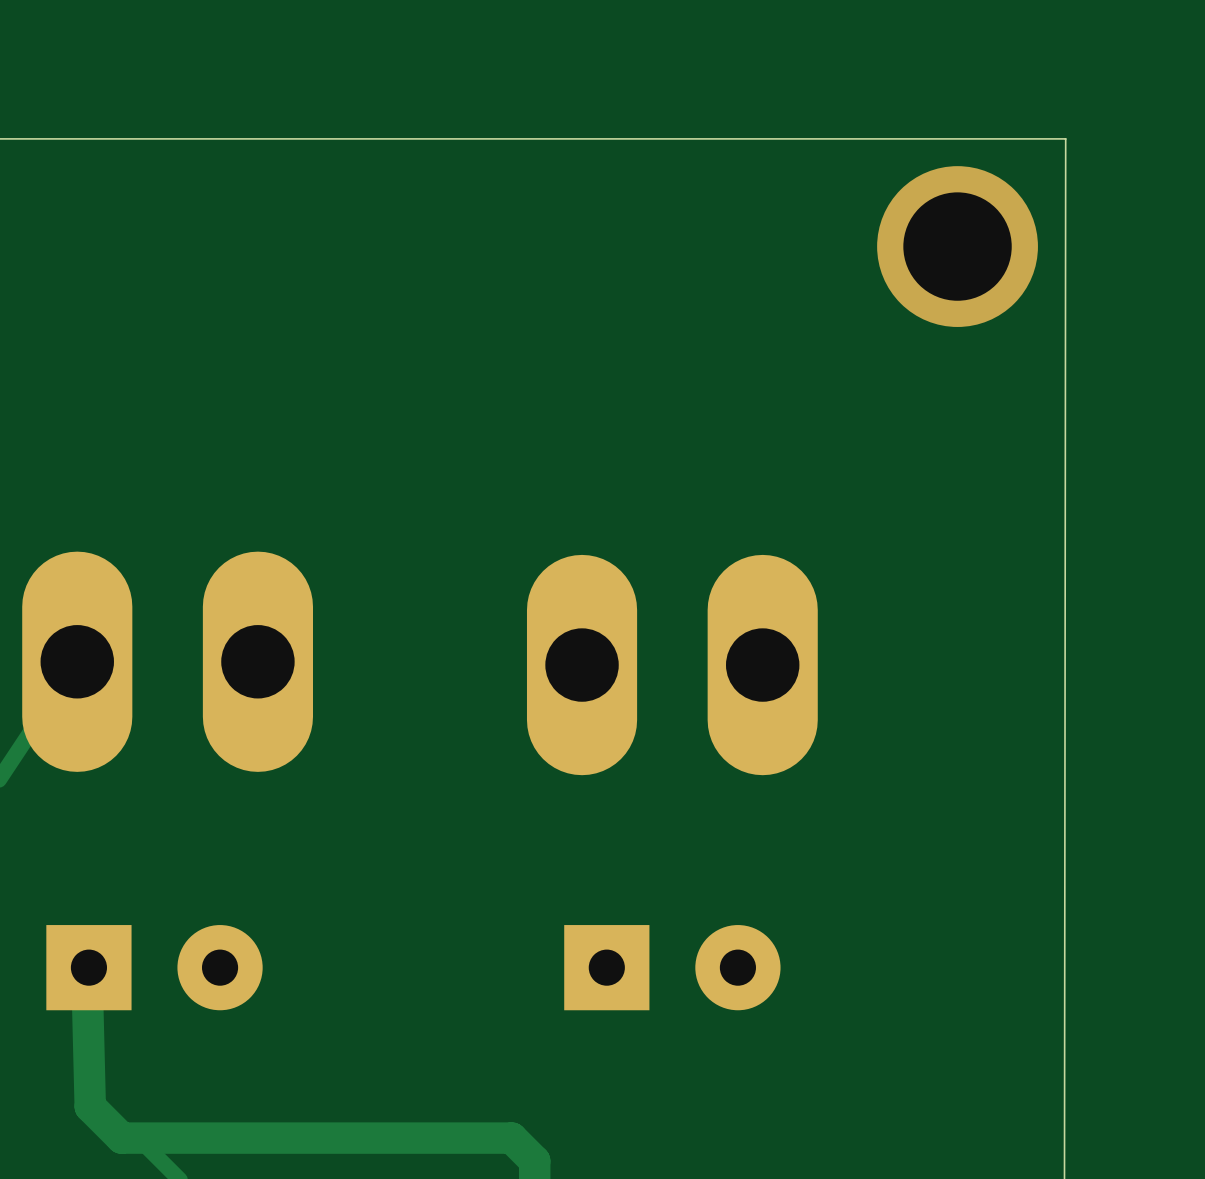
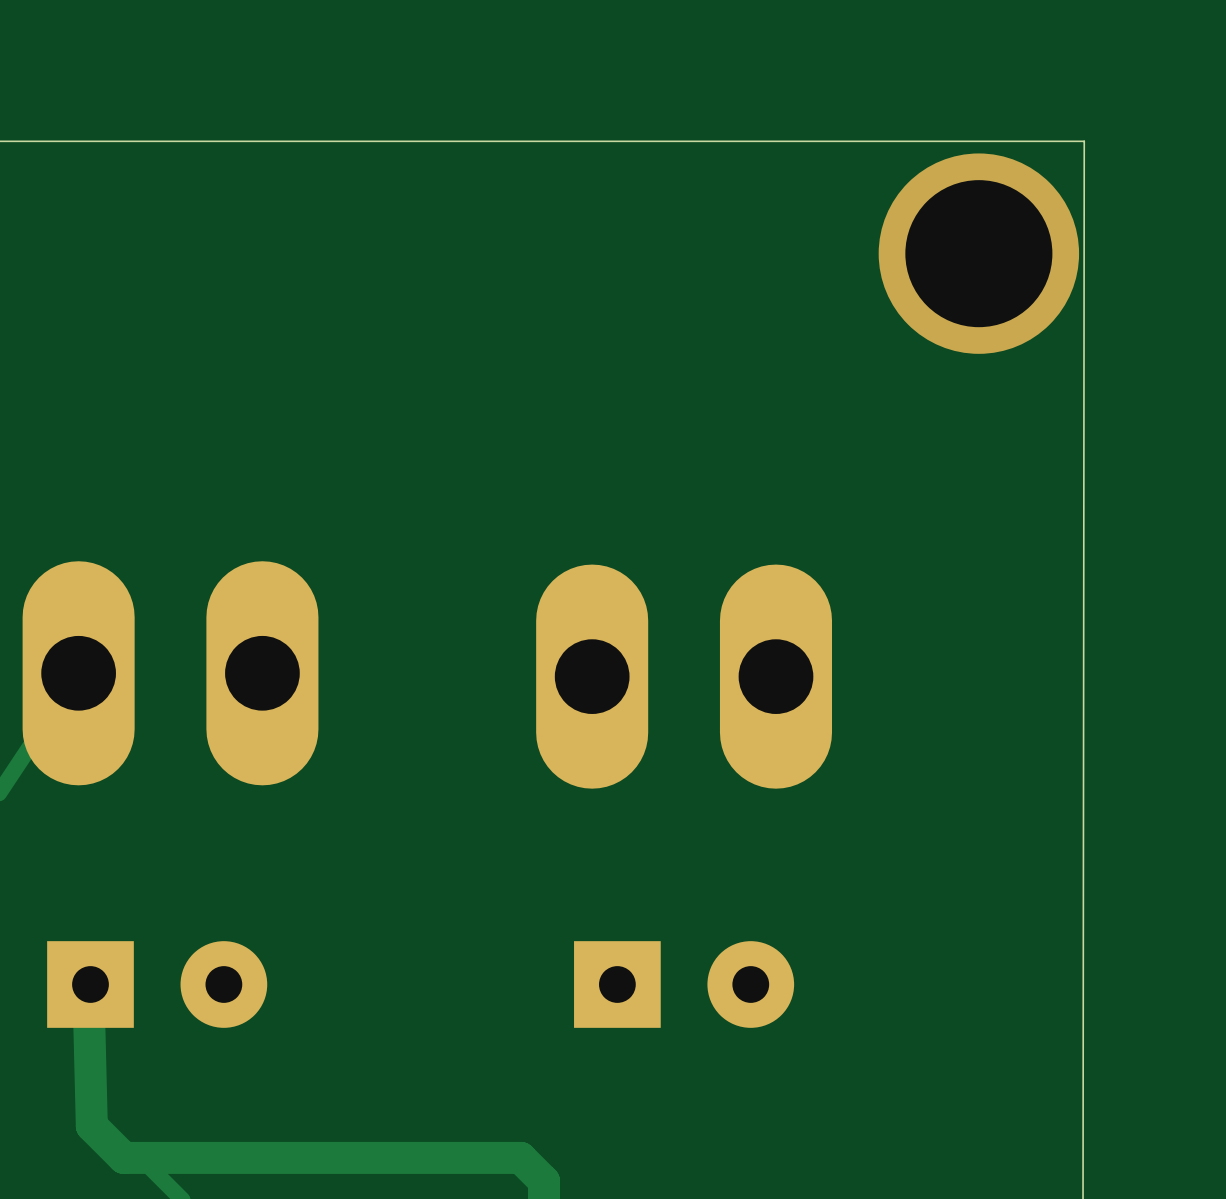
via size: [877, 166, 1038, 327] -> [878, 153, 1080, 354]

